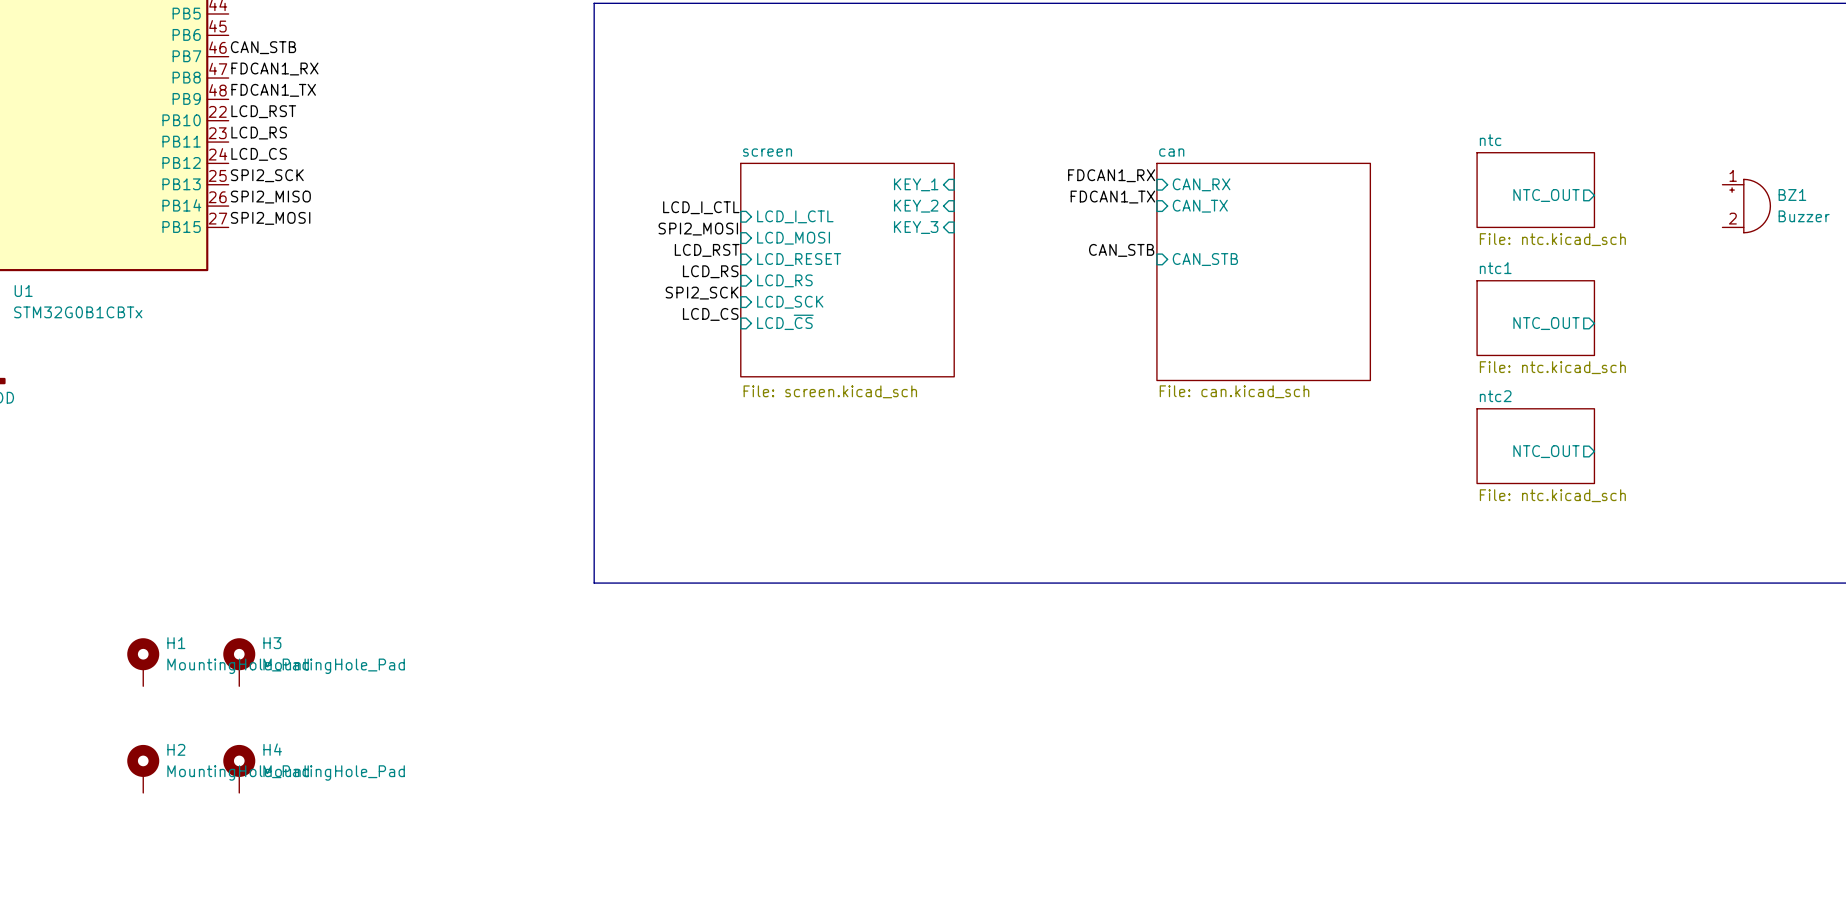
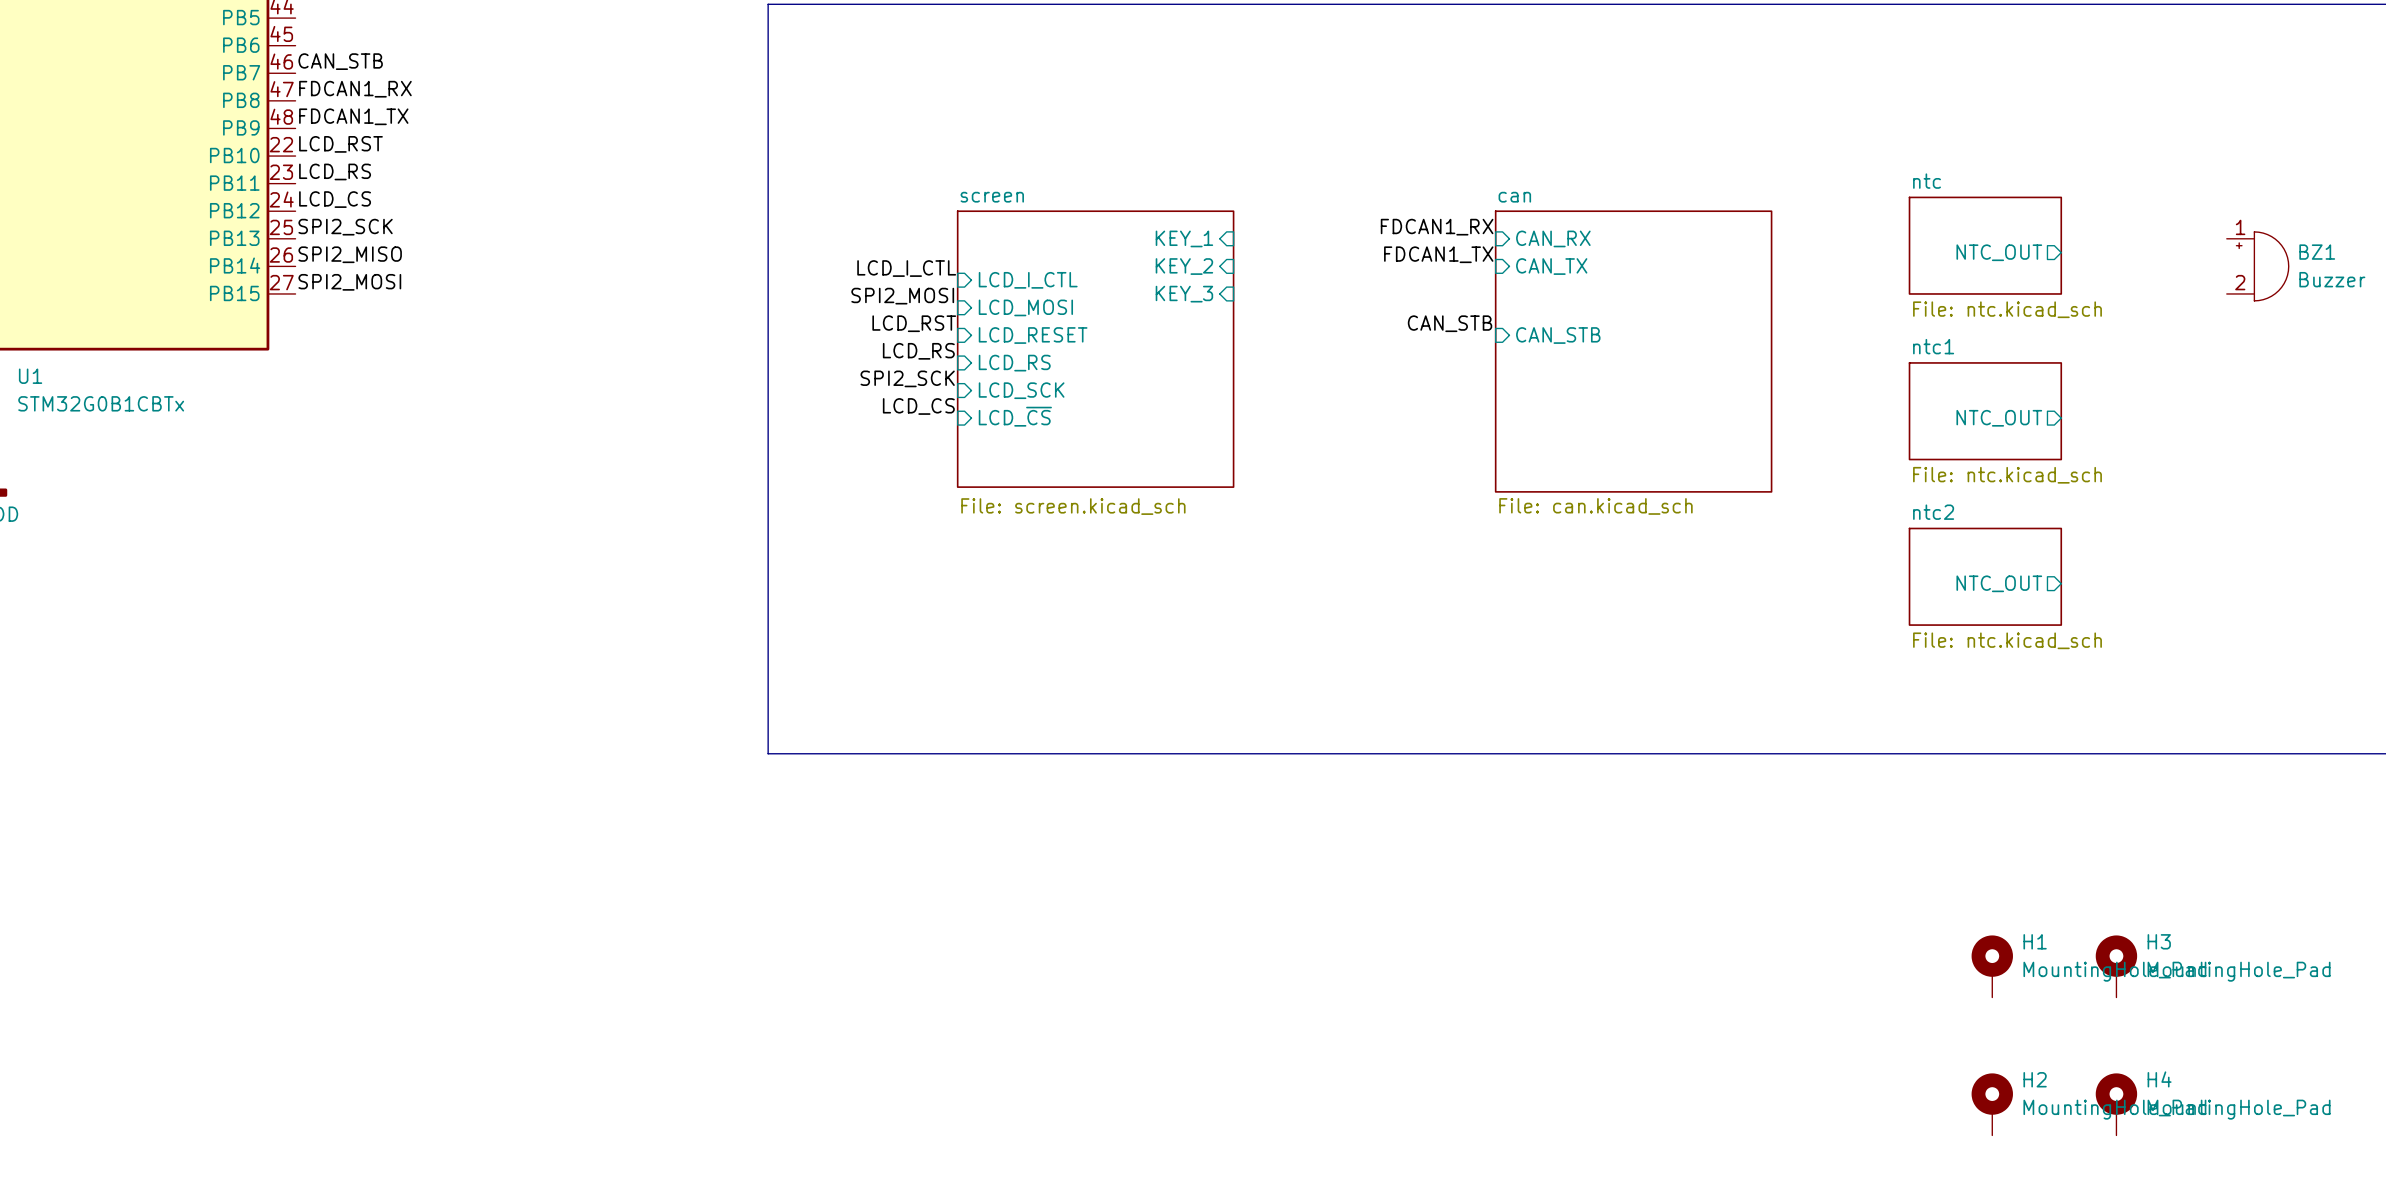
H1 position: (143, 662) -> (1992, 966)
H3 position: (239, 662) -> (2116, 966)
H2 position: (143, 768) -> (1992, 1104)
H4 position: (239, 768) -> (2116, 1104)

